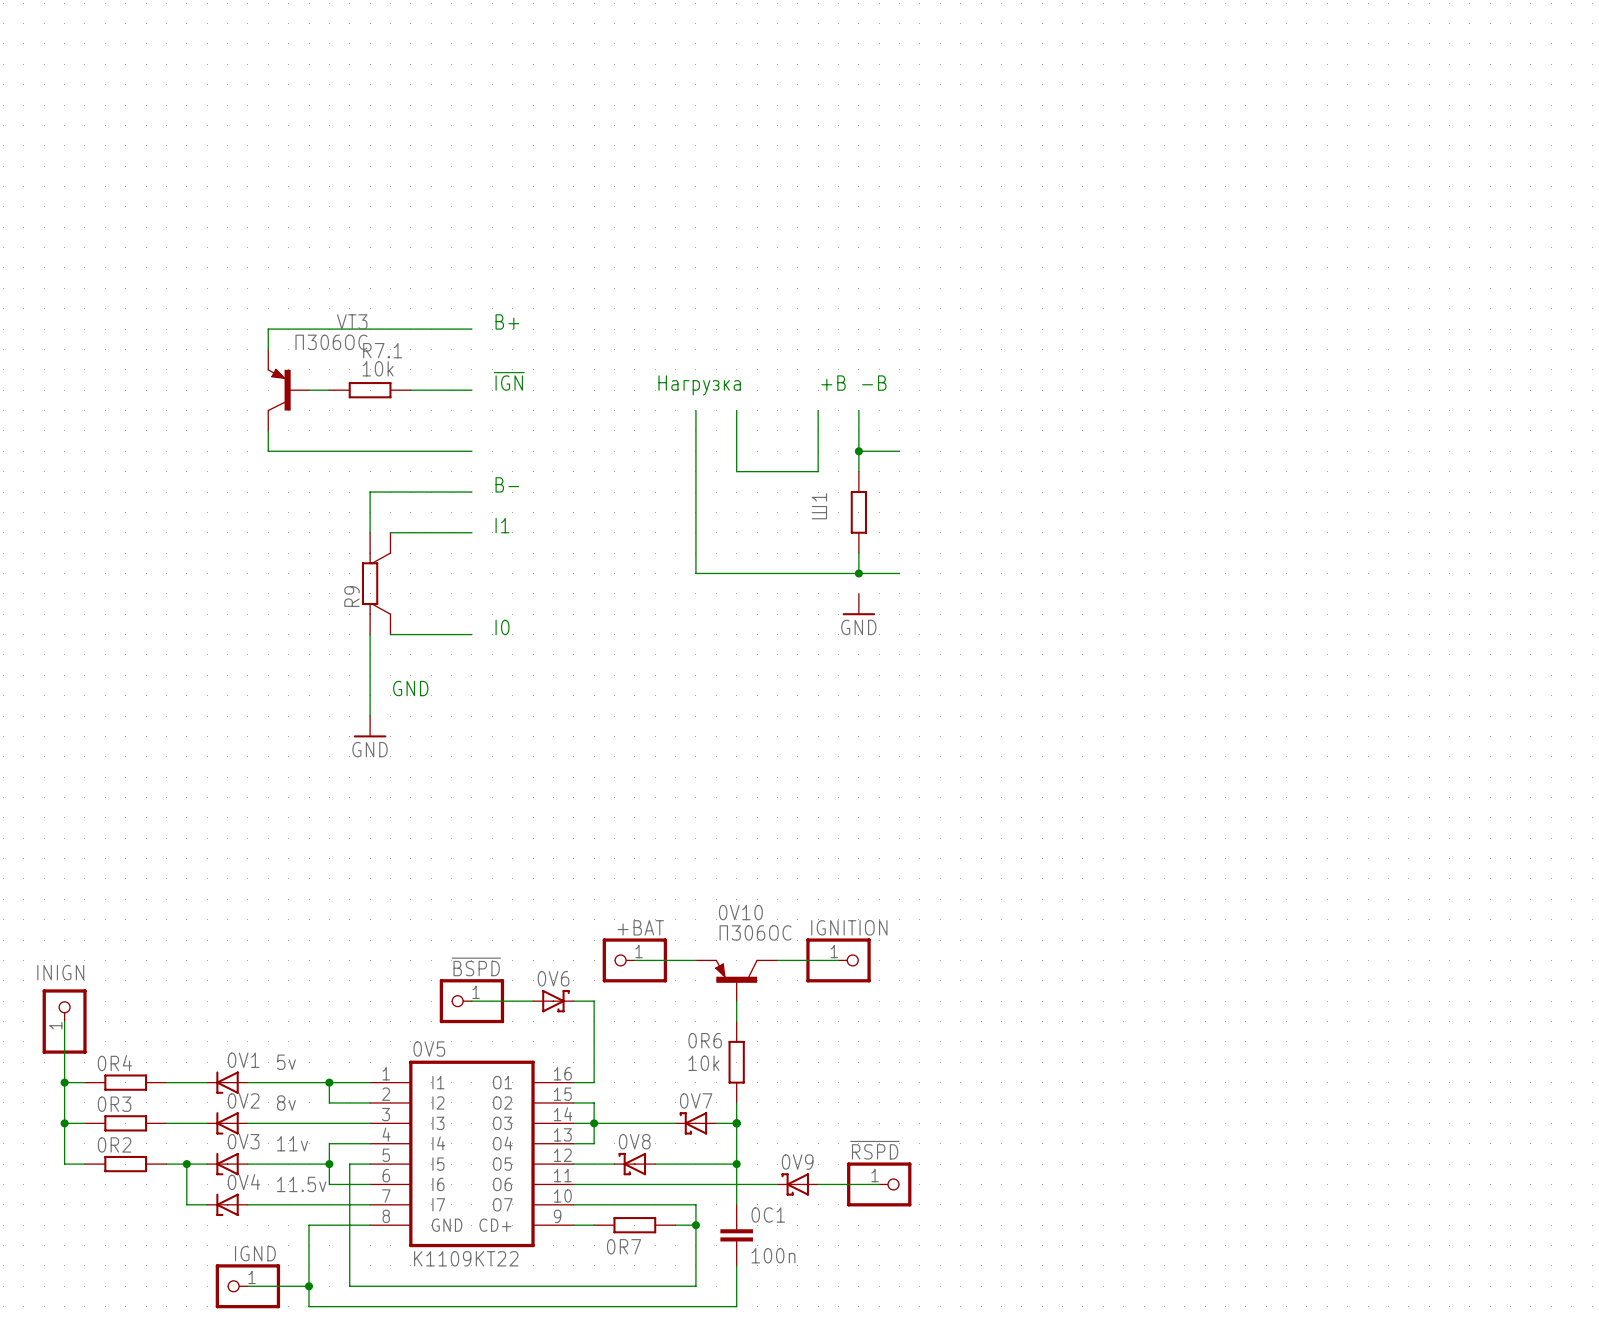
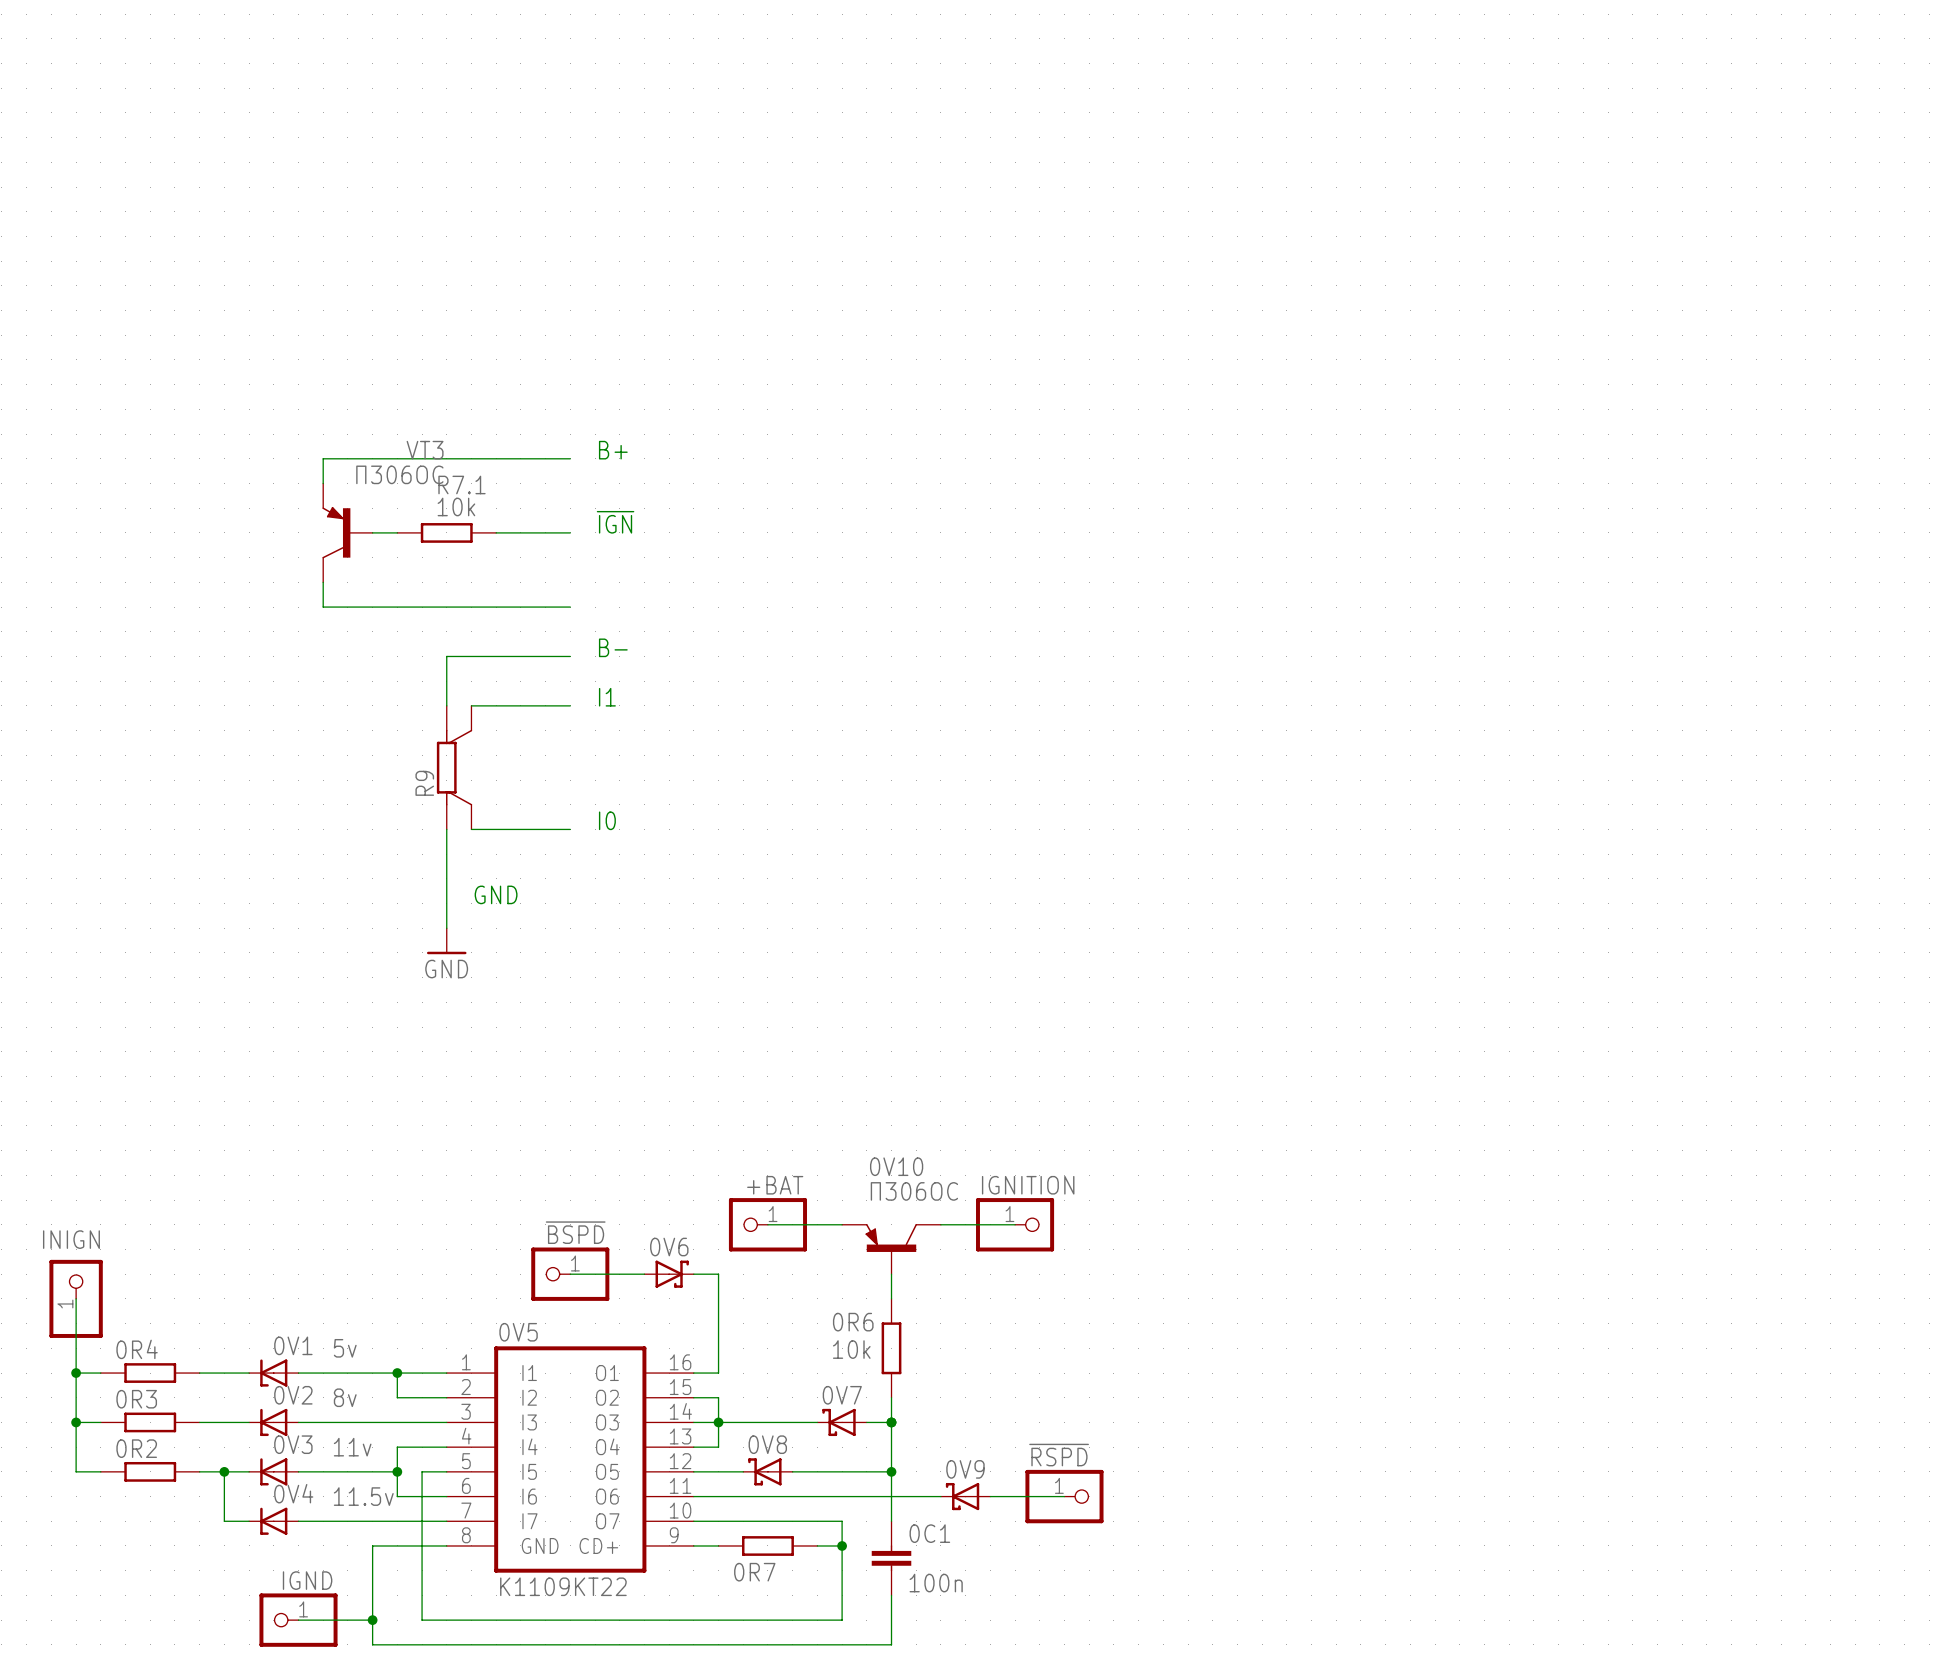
text: +B (833, 383) -> none
text: -B (874, 383) -> none
text: Нагрузка (699, 385) -> none
wire: (695, 410) (695, 573) (899, 573) -> none
wire: (736, 410) (736, 471) (818, 471) (818, 410) -> none
wire: (858, 410) (858, 471) -> none
wire: (858, 451) (899, 451) -> none
junction: (858, 451) -> none
Ш1: (858, 512) -> none
wire: (858, 553) (858, 573) -> none
junction: (858, 573) -> none
power symbol: GND (858, 604) -> none

